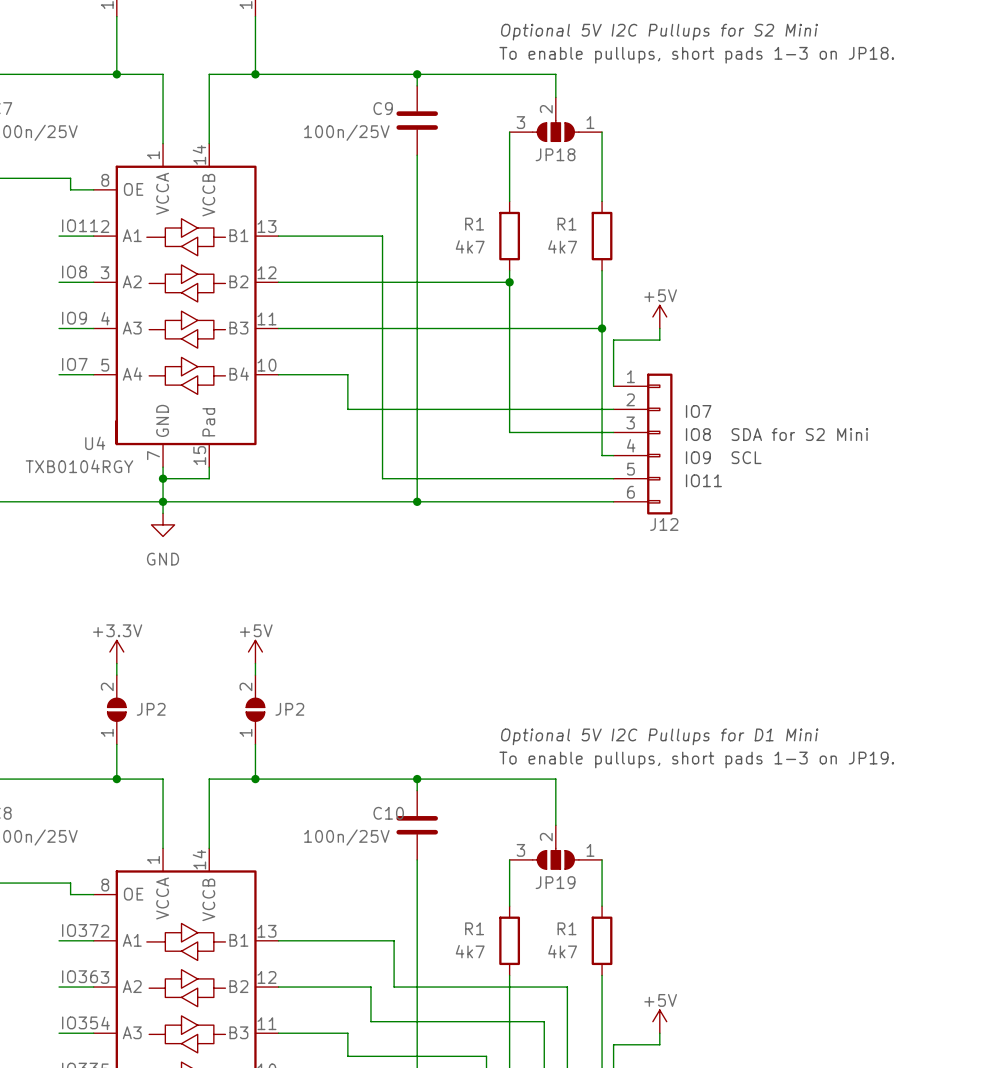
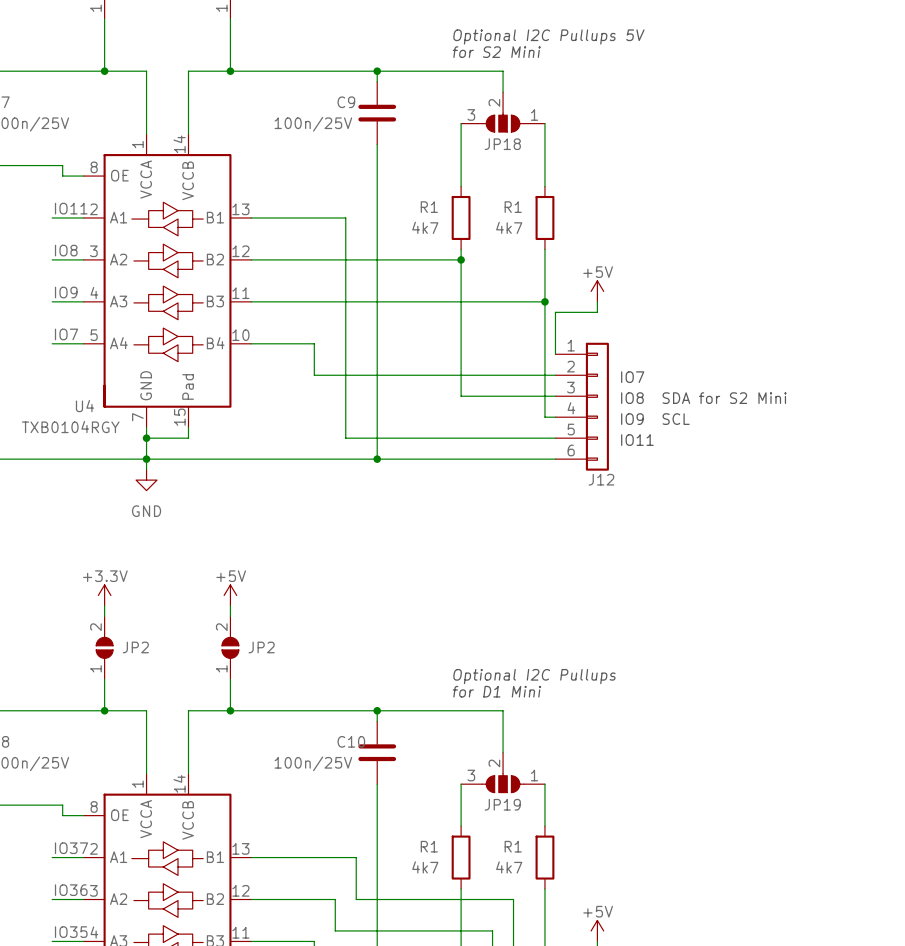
text: Optional 5V I2C Pullups for S2 Mini (659, 32) -> Optional I2C Pullups 5V (548, 36)
text: To enable pullups, short pads 1-3 on JP18. (696, 55) -> for S2 Mini (496, 52)
text: Optional 5V I2C Pullups for D1 Mini (659, 736) -> Optional I2C Pullups (534, 676)
text: To enable pullups, short pads 1-3 on JP19. (696, 759) -> for D1 Mini (496, 691)

